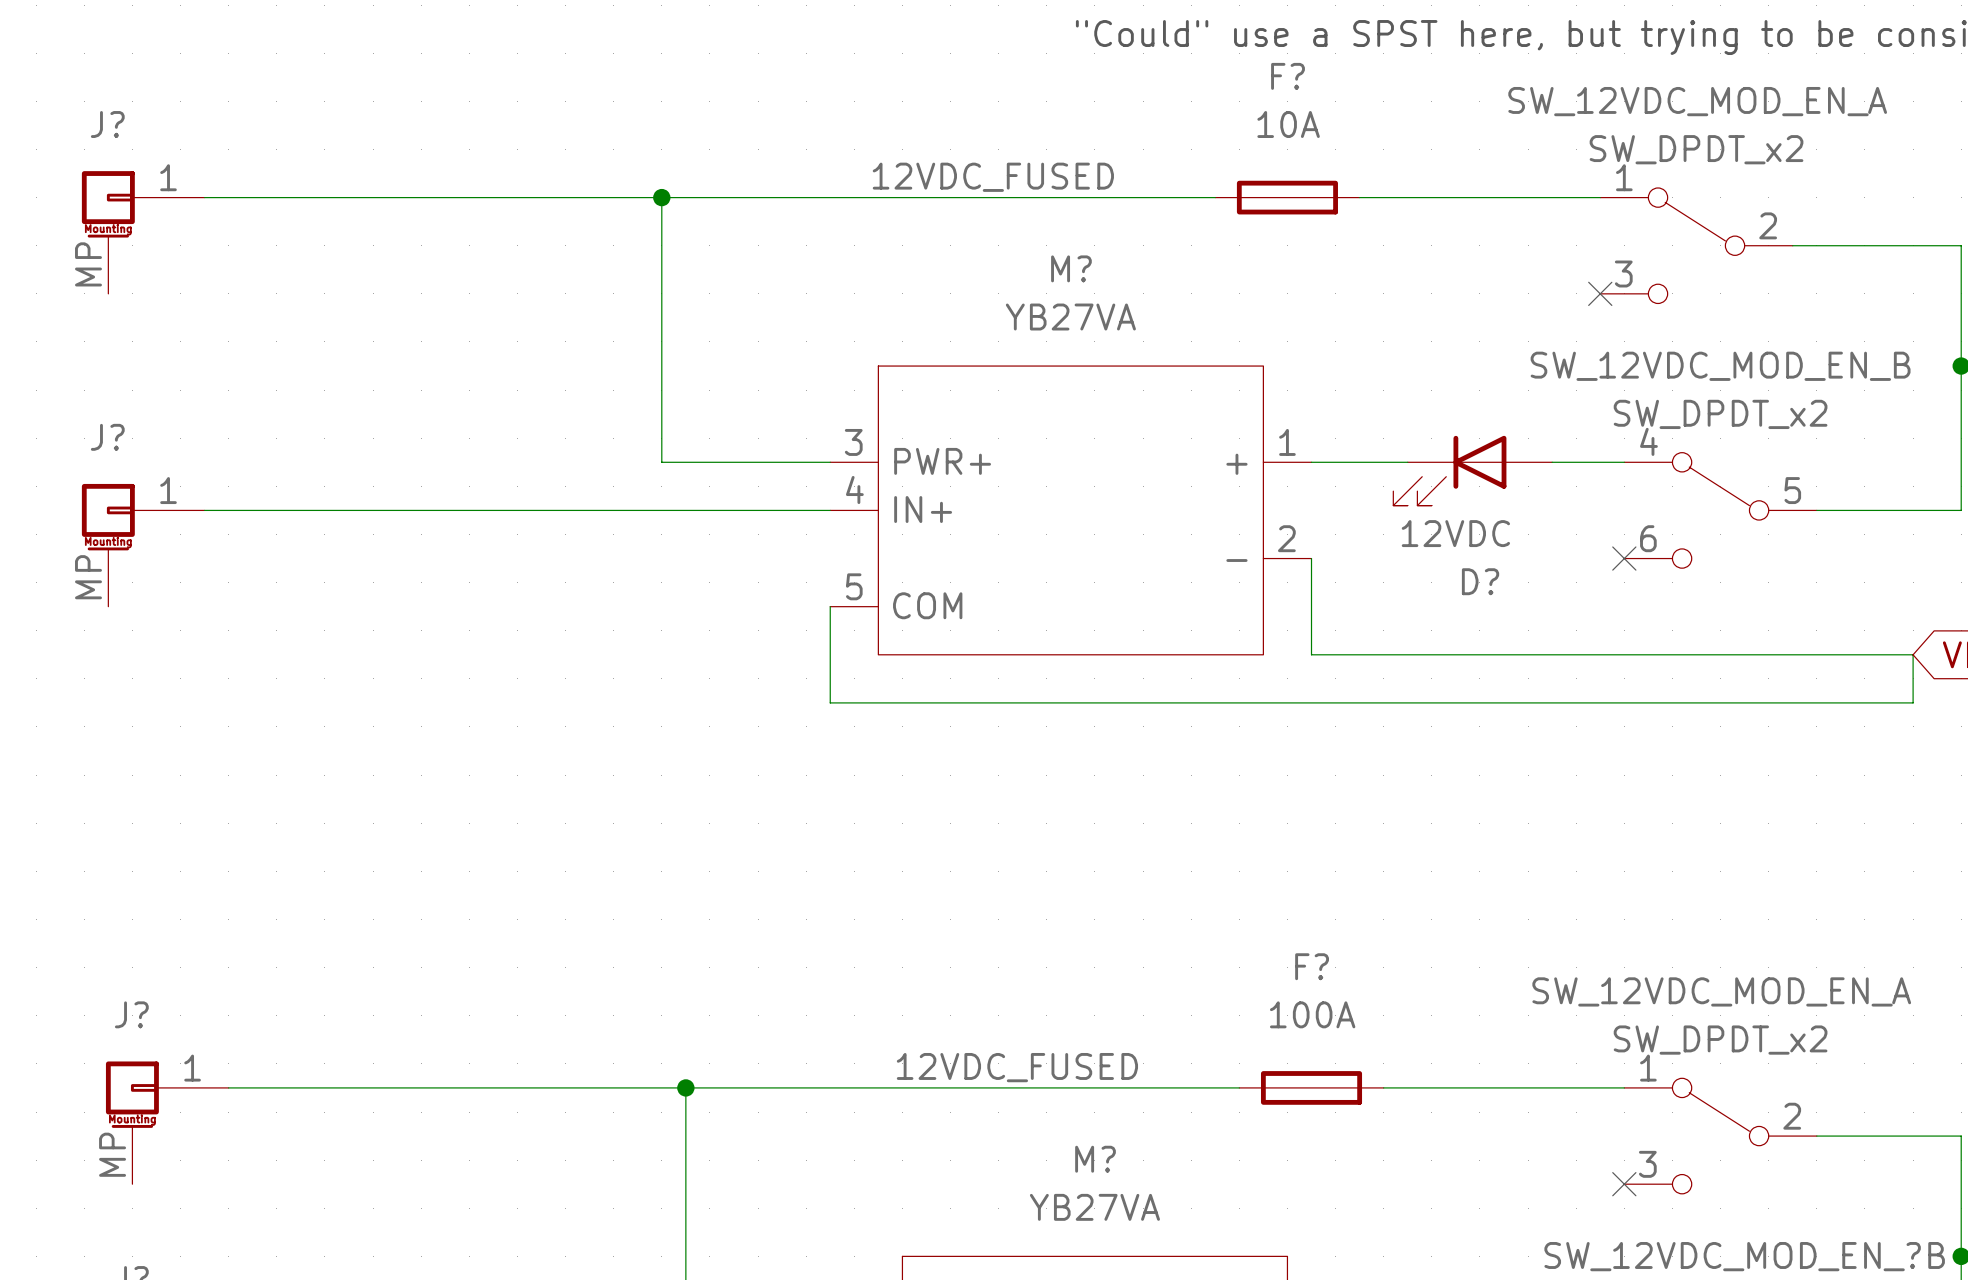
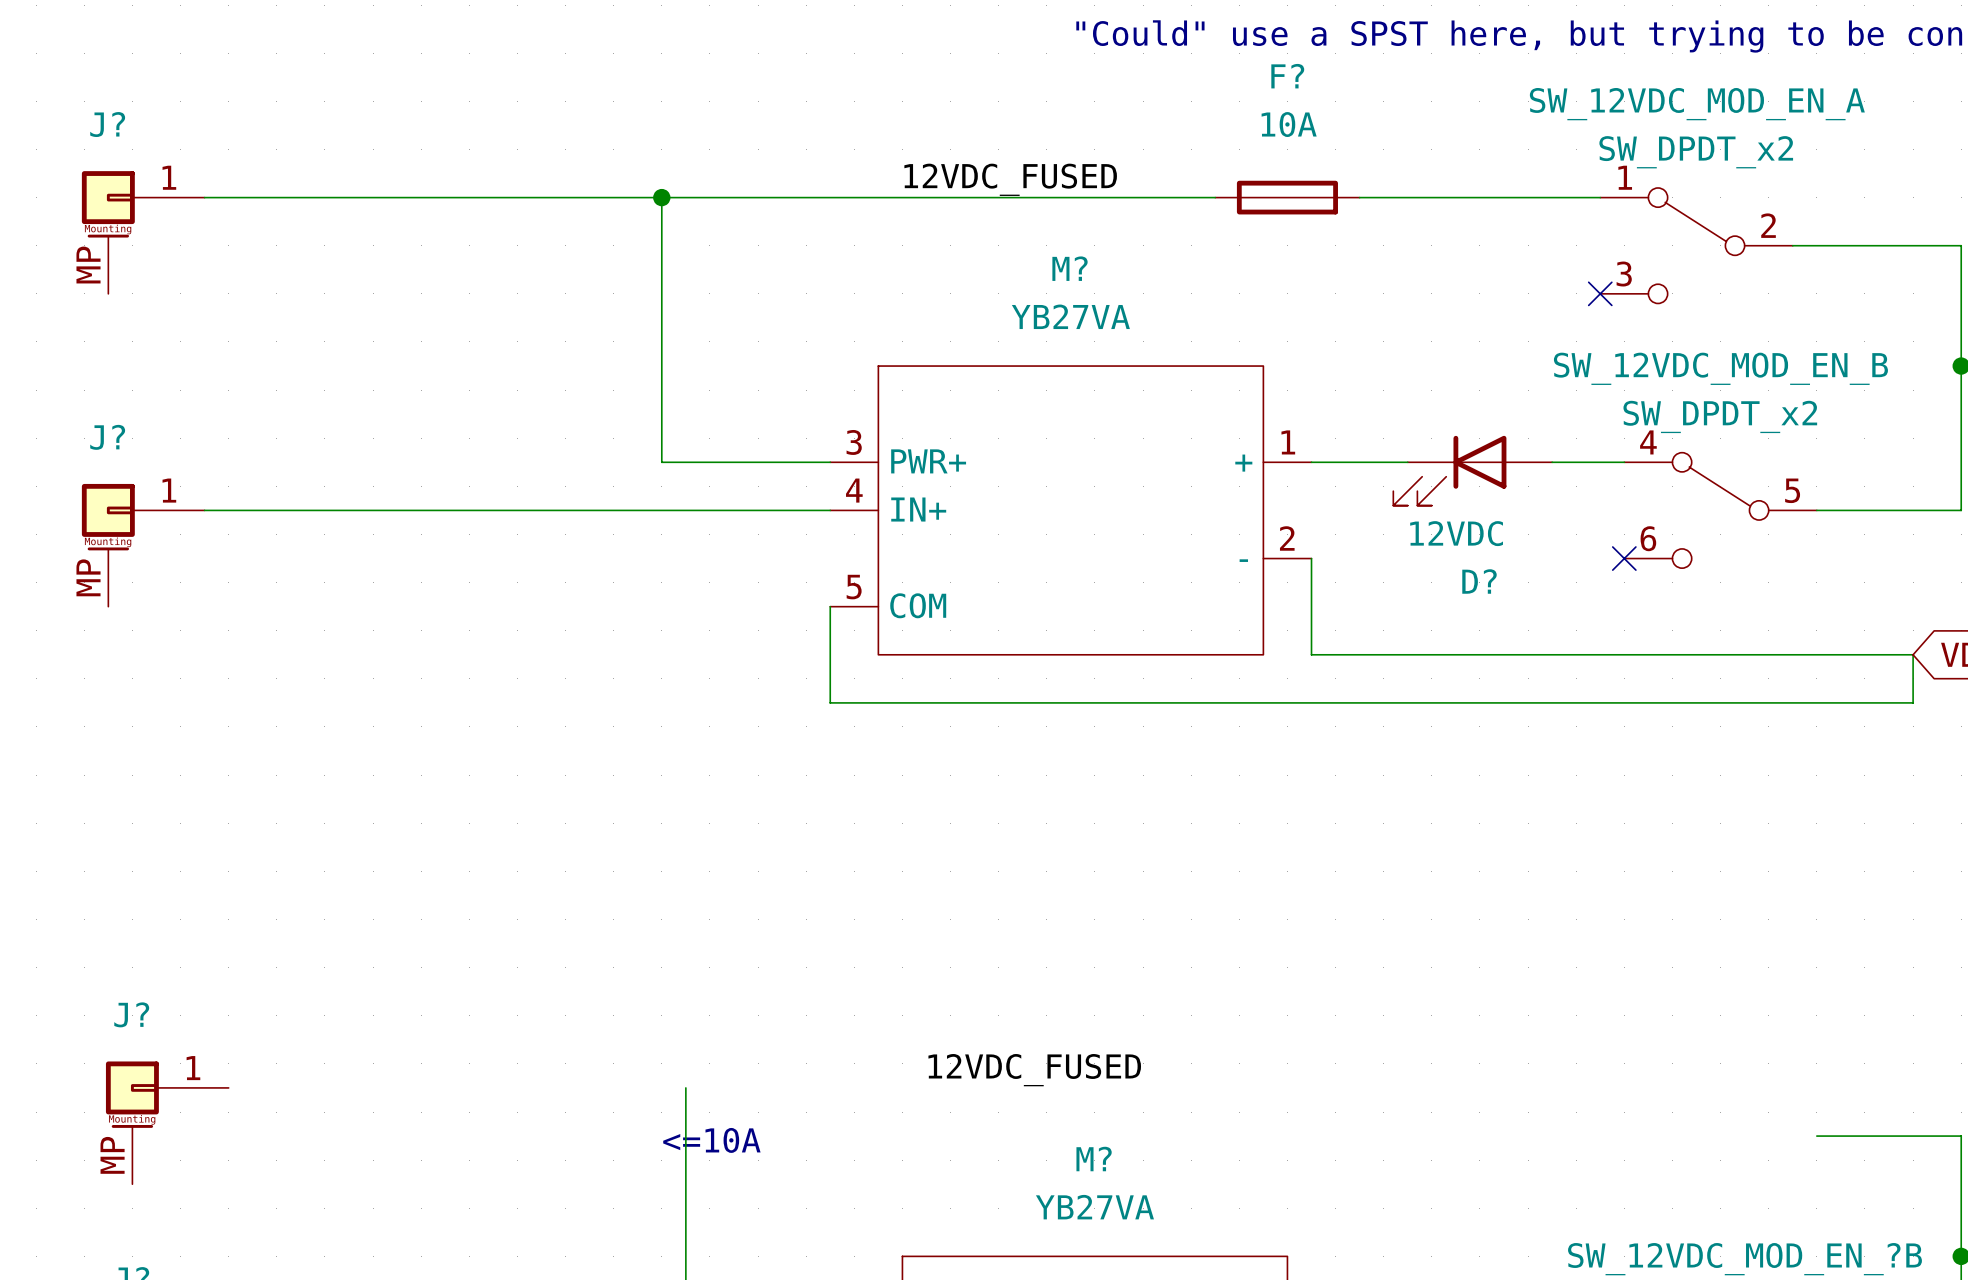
wire: (228, 1087) (1239, 1087) -> none
junction: (685, 1087) -> none
F?: 100A (1311, 1087) -> none
wire: (1383, 1087) (1624, 1087) -> none
SW_12VDC_MOD_EN_A: SW_DPDT_x2 (1720, 1136) -> none
text: none -> <=10A (711, 1140)
no-connect mark: (1624, 1184) -> none

